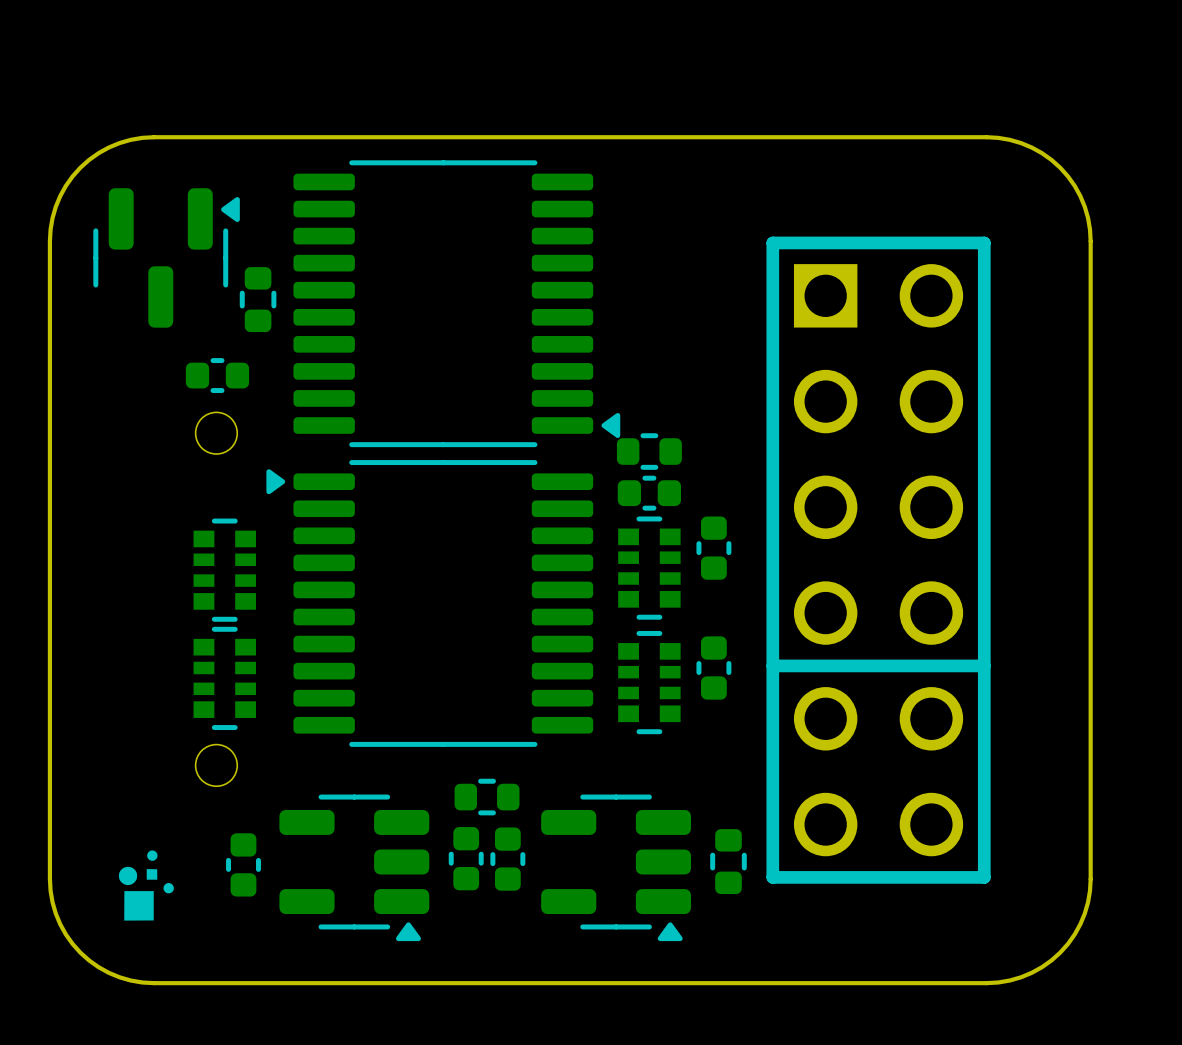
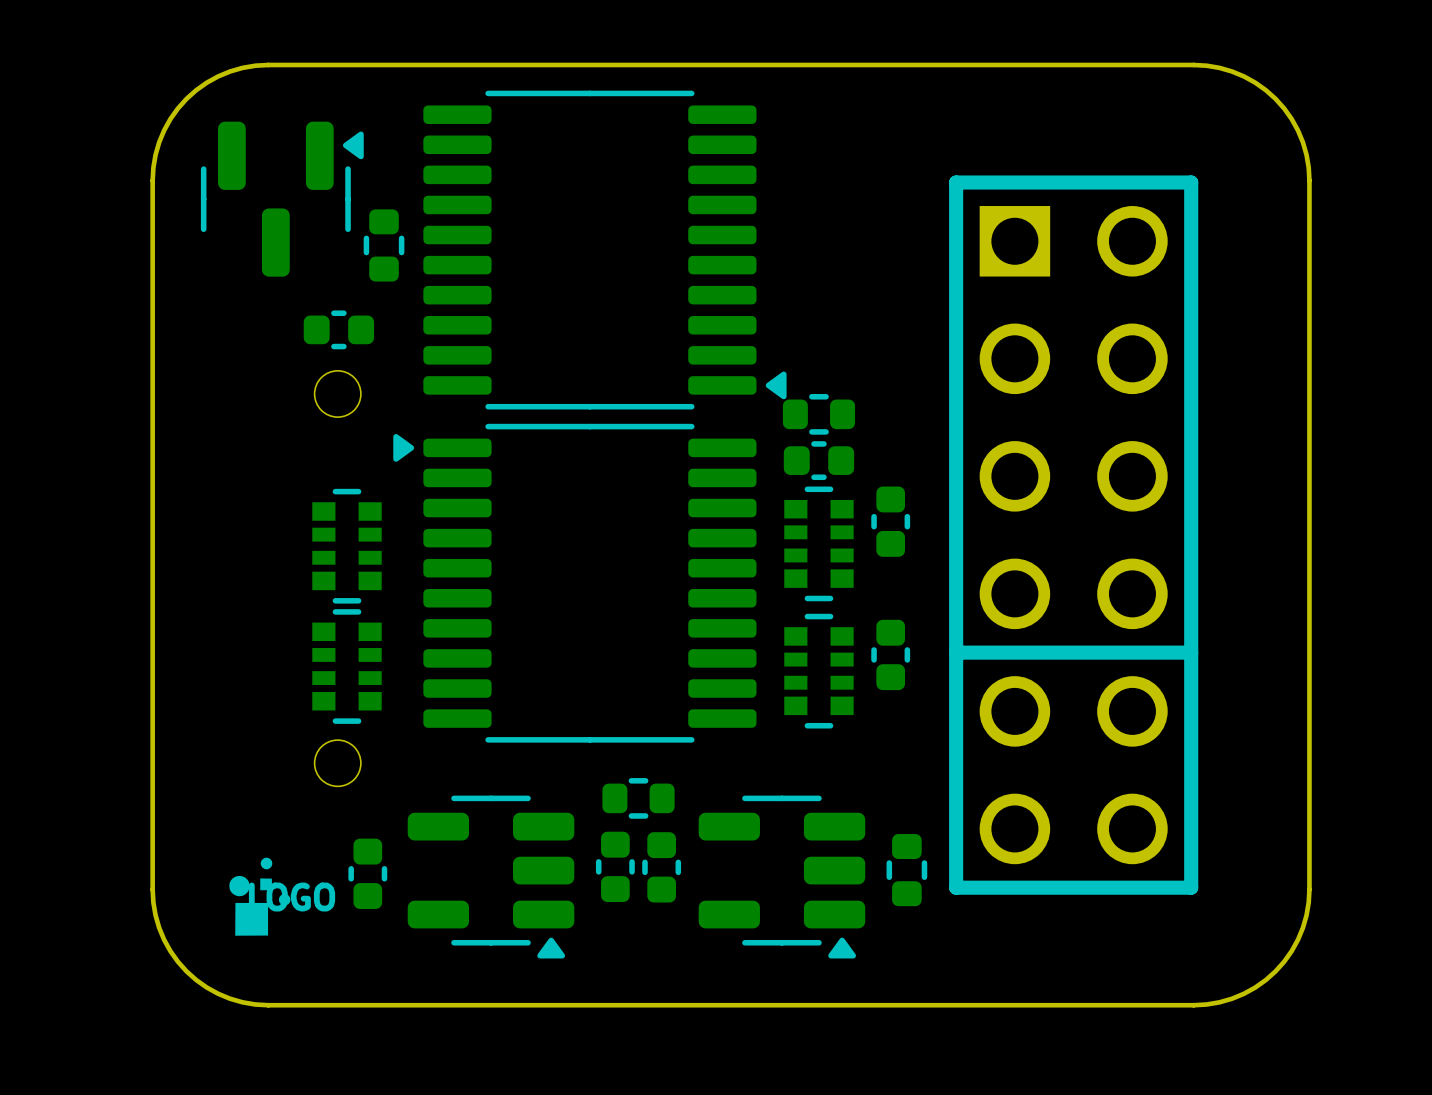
drawing shape: [118, 850, 174, 921] -> [229, 857, 336, 936]

